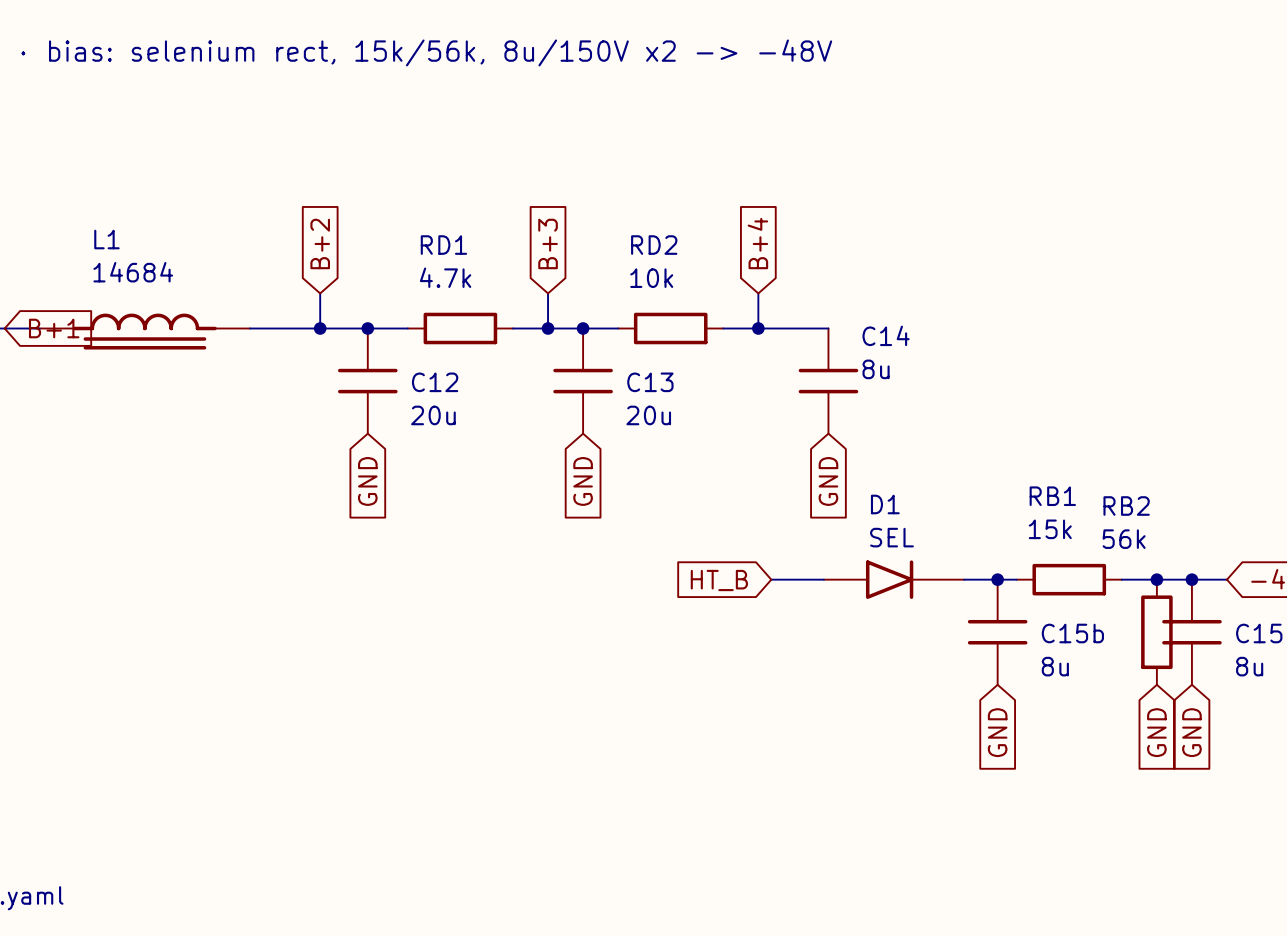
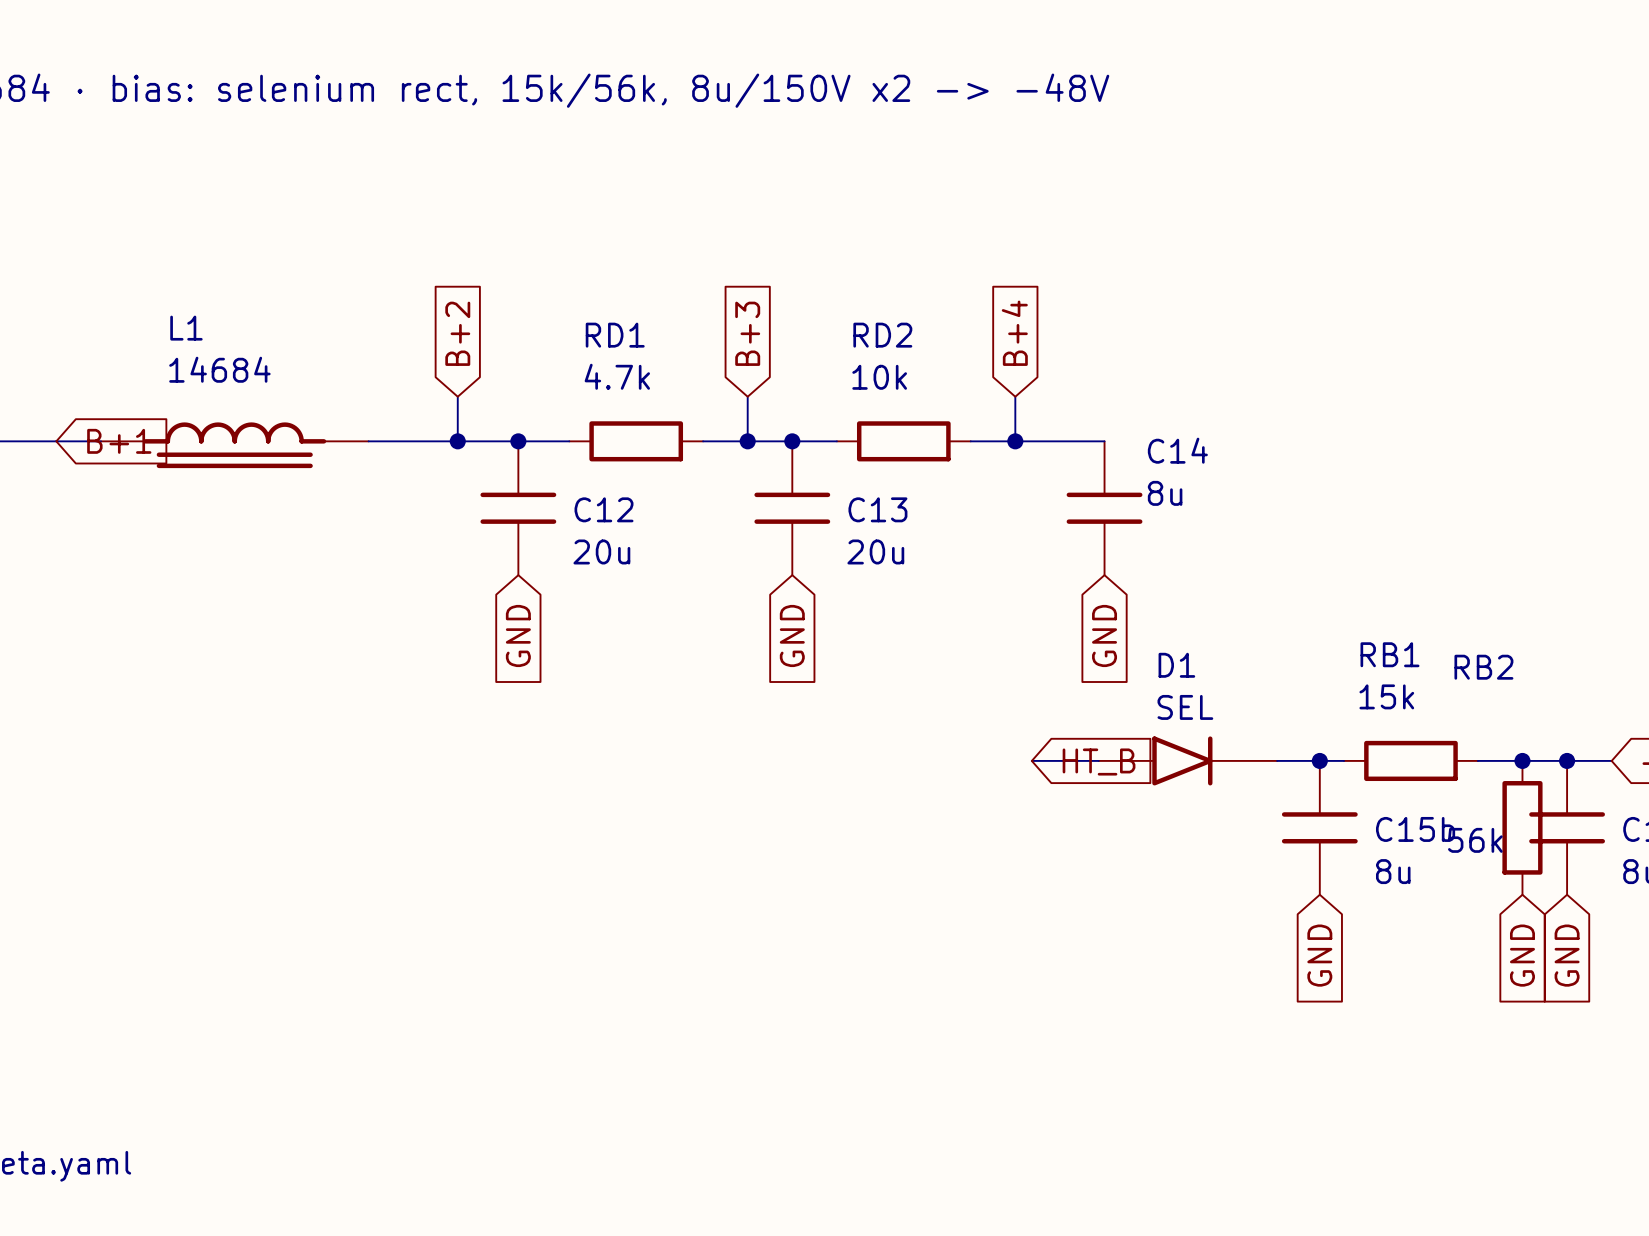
RB2 value position: 56k (1124, 539) -> 56k (1475, 840)
global label rotation: 0° (719, 580) -> 180° (1099, 762)

